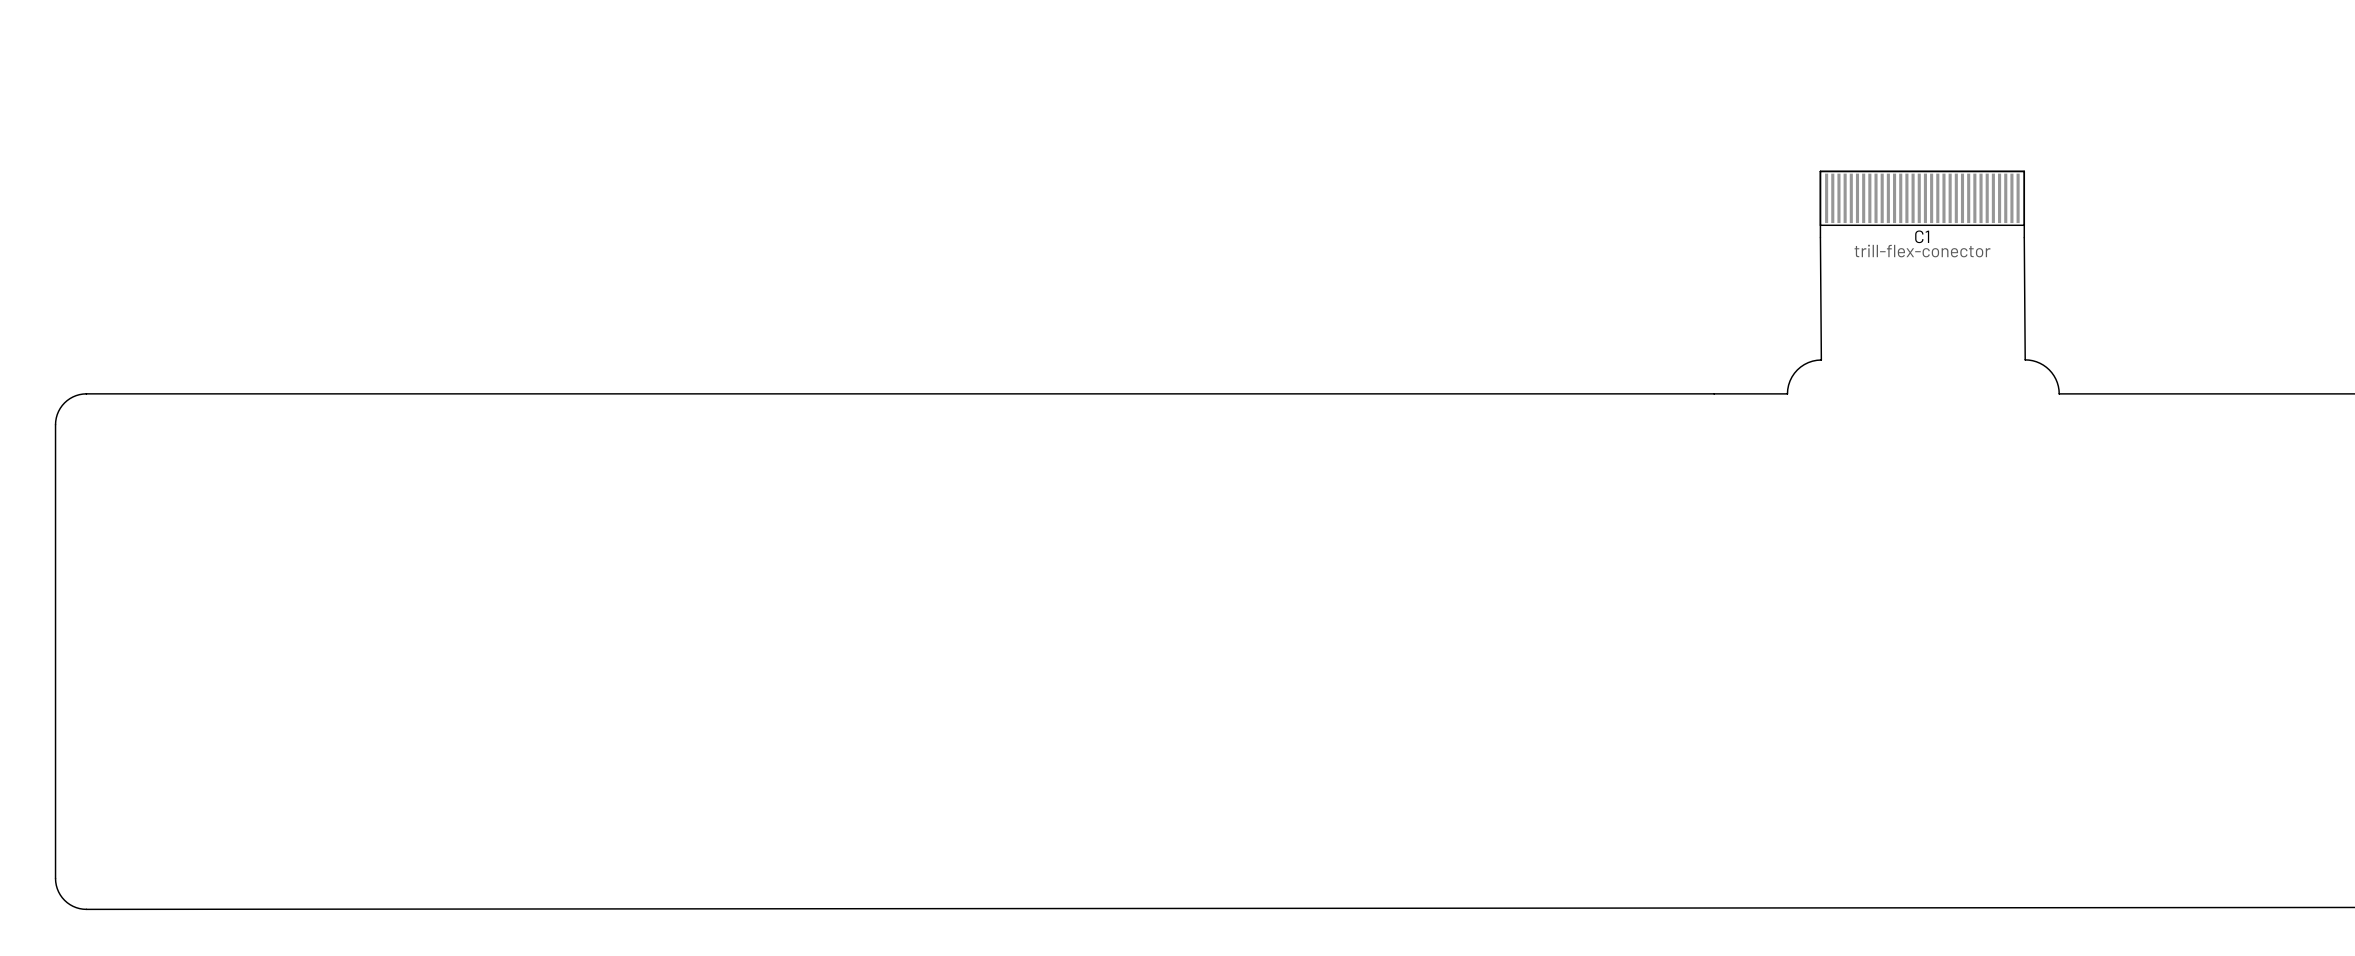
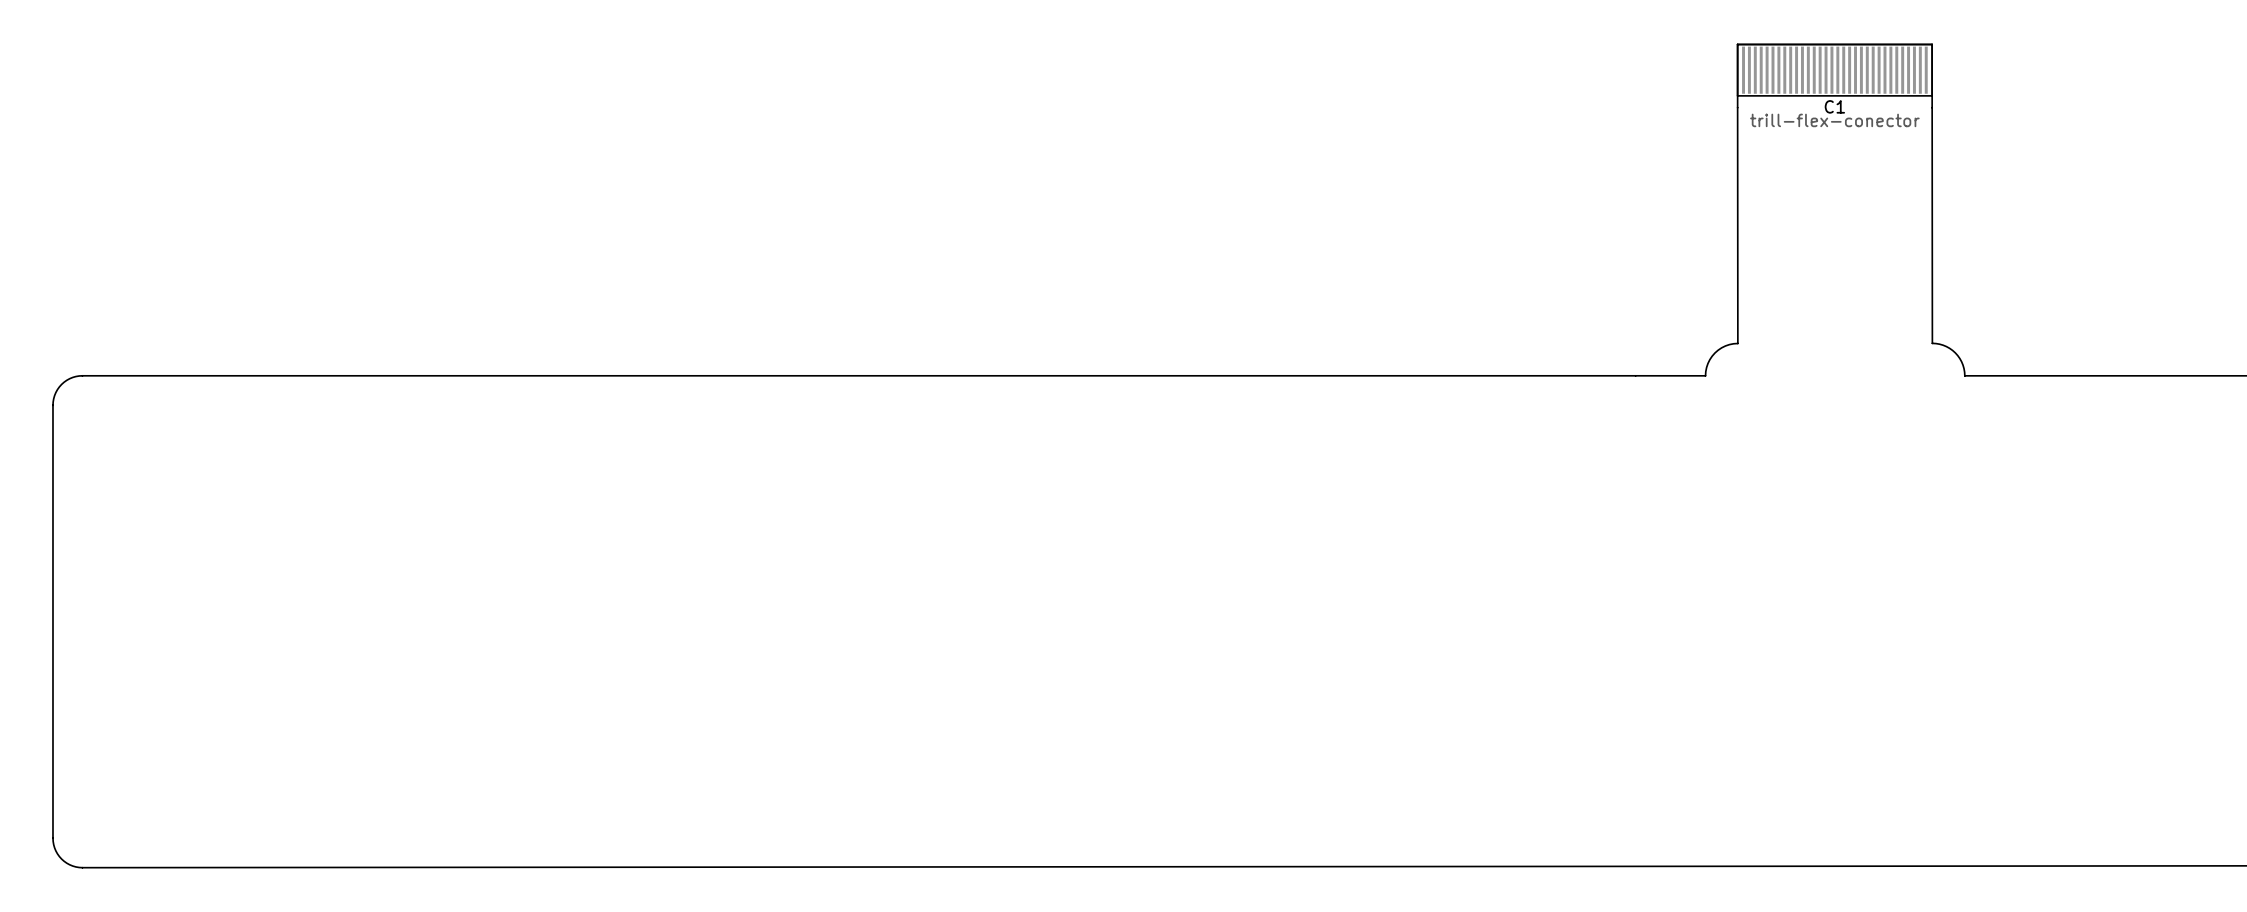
C1 position: (1922, 204) -> (1834, 76)
board edge: (1820, 237) (1821, 360) -> (1737, 107) (1737, 343)
board edge: (2024, 237) (2025, 359) -> (1932, 107) (1932, 343)

